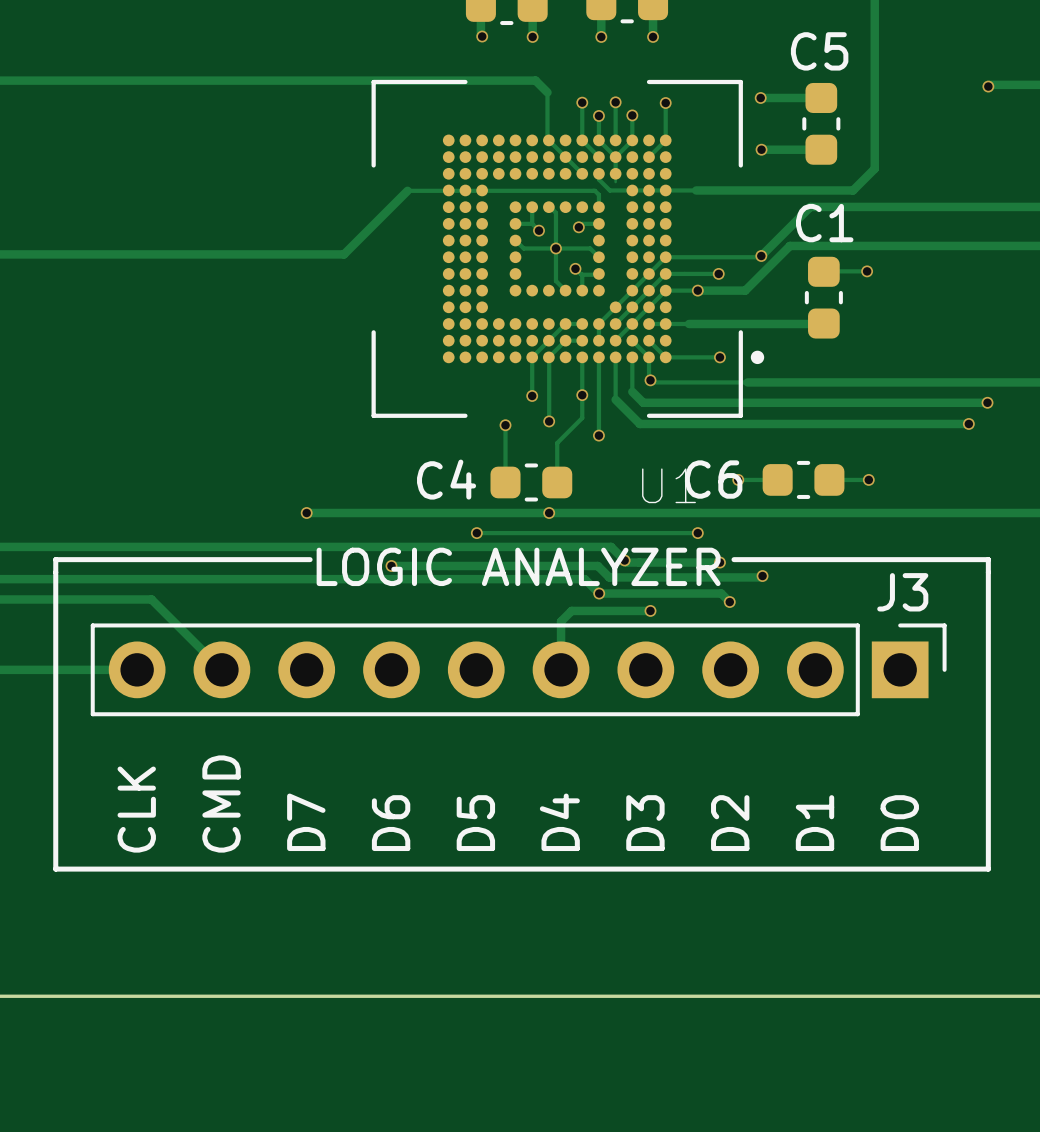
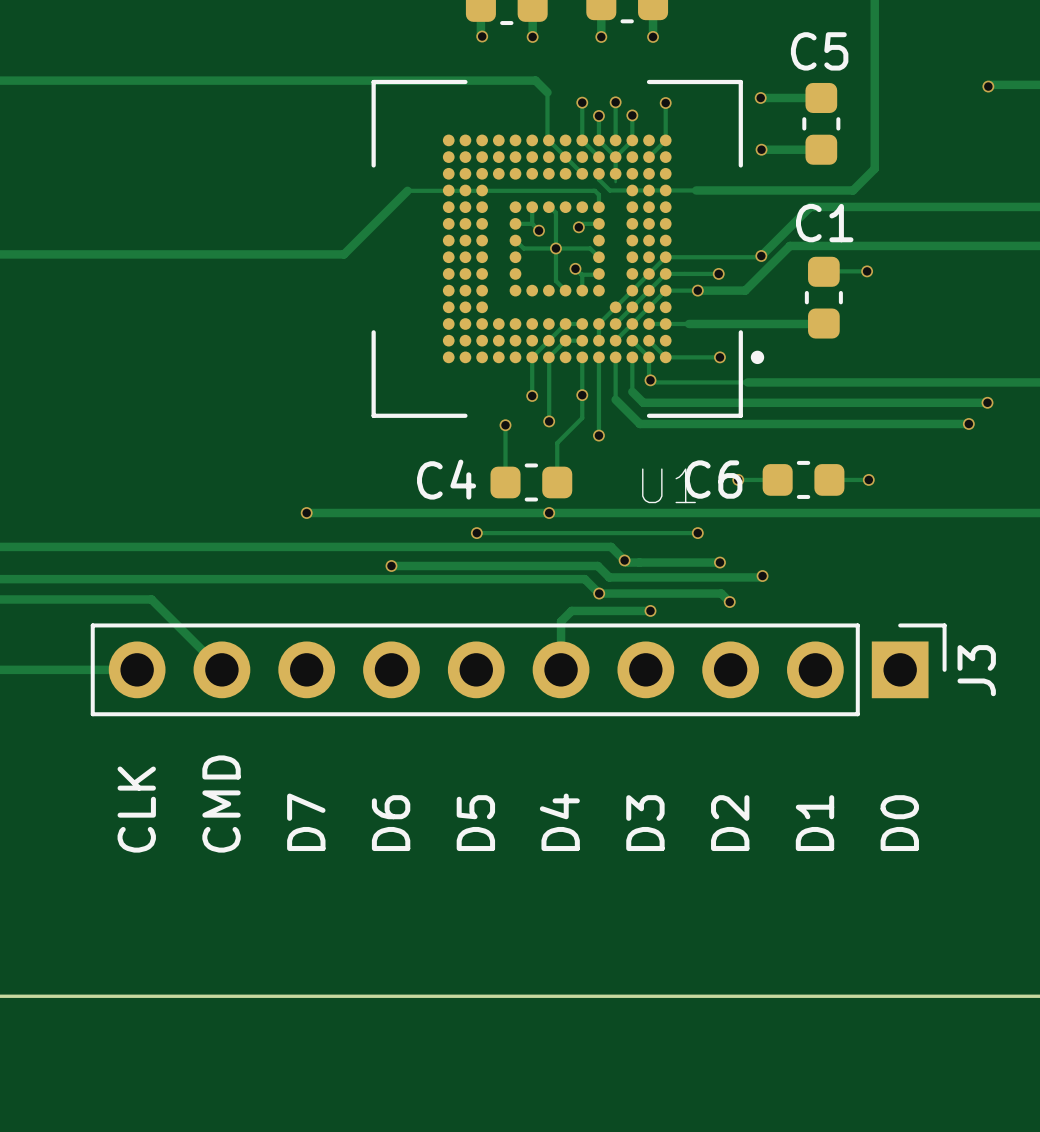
line: (310, 559) (55, 559) (55, 869) (988, 869) (988, 559) (734, 559) -> none
text: LOGIC ANALYZER (518, 566) -> none
J3 name rotation: 0° (902, 592) -> 90° counterclockwise (976, 670)
J3 name position: J3 (902, 592) -> J3 (976, 670)

